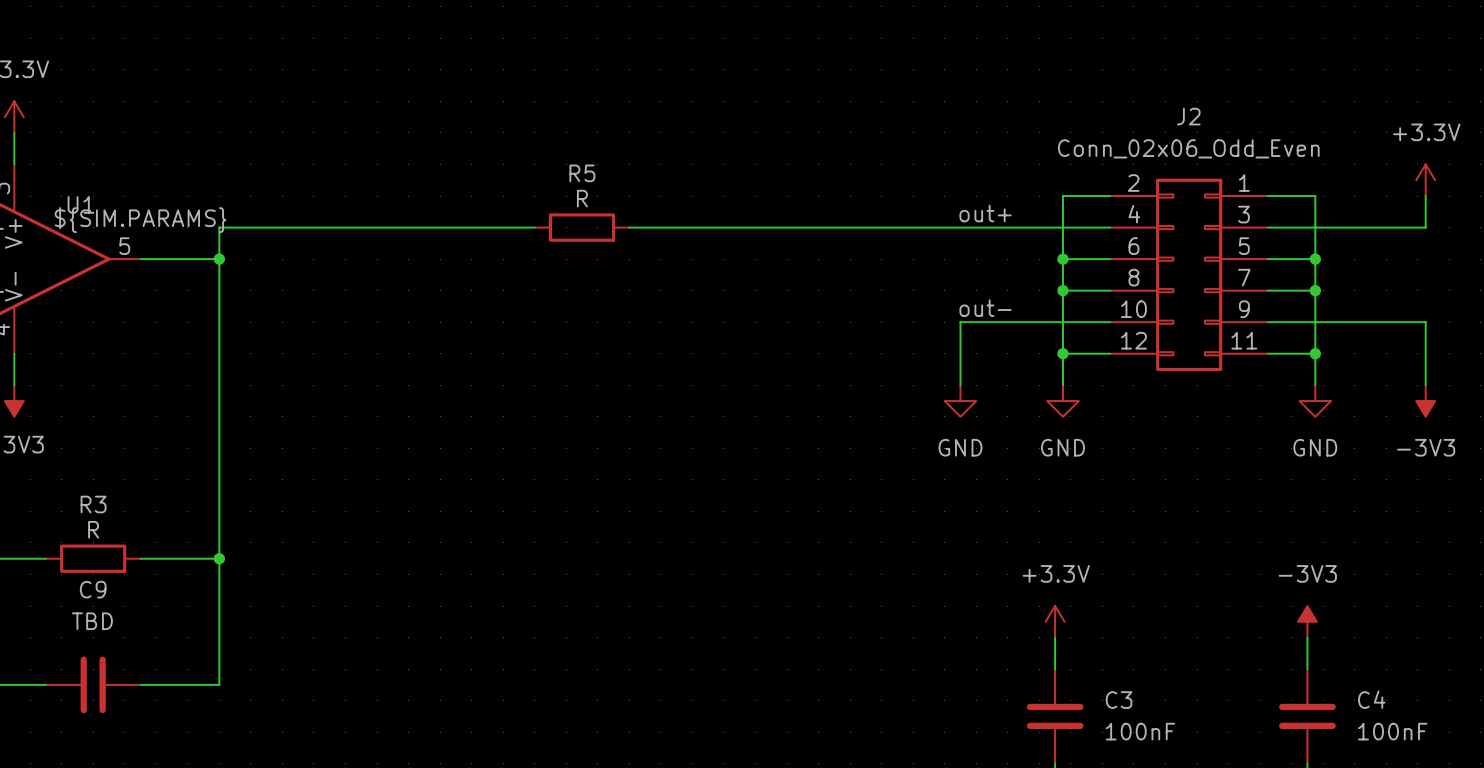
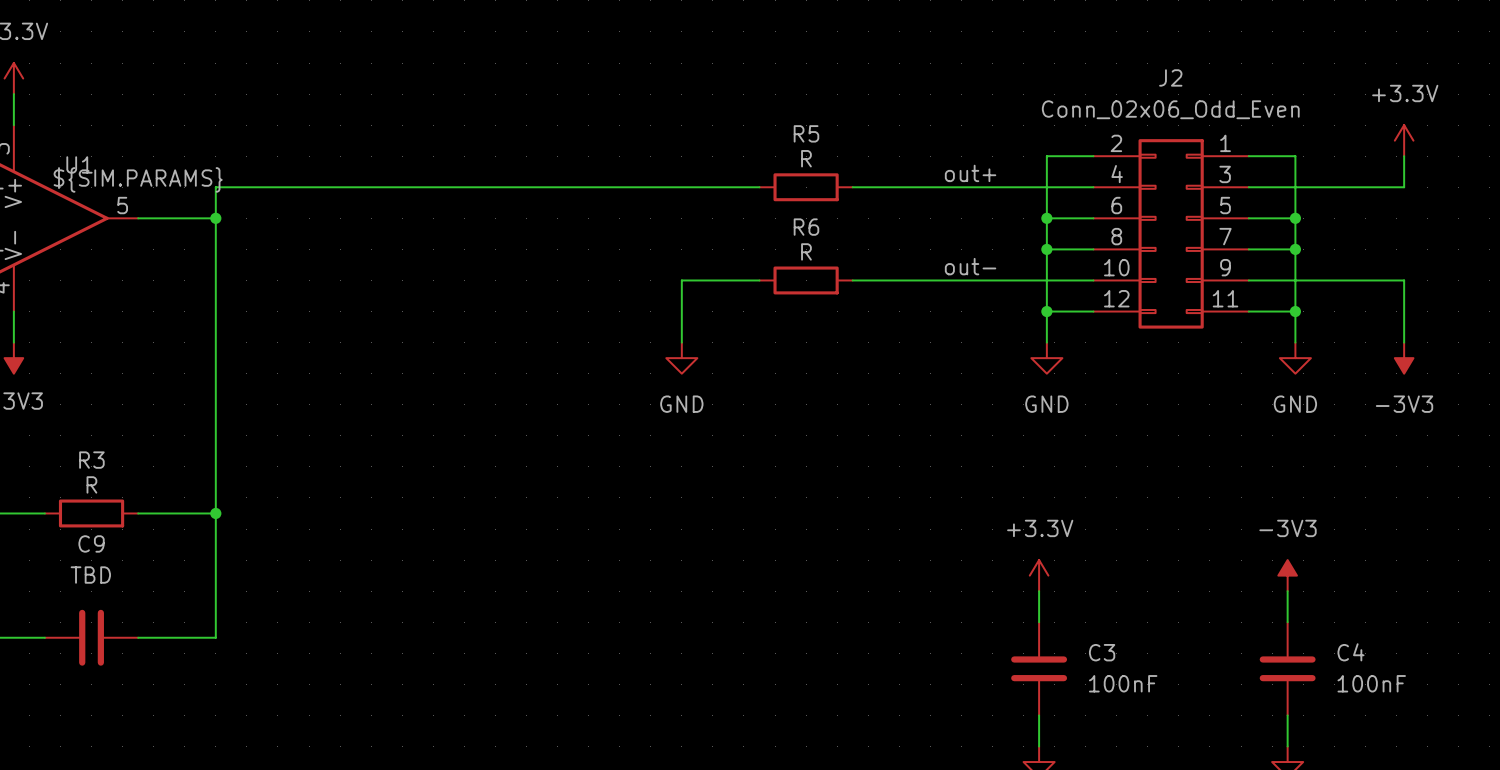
R5 position: (582, 227) -> (806, 187)
wire: (771, 227) (865, 227) -> (526, 187) (619, 187)
wire: none -> (759, 280) (681, 280) (681, 342)
R6: none -> R (806, 280)
wire: (960, 322) (960, 385) -> (945, 280) (852, 280)
power symbol position: GND (960, 401) -> GND (681, 358)

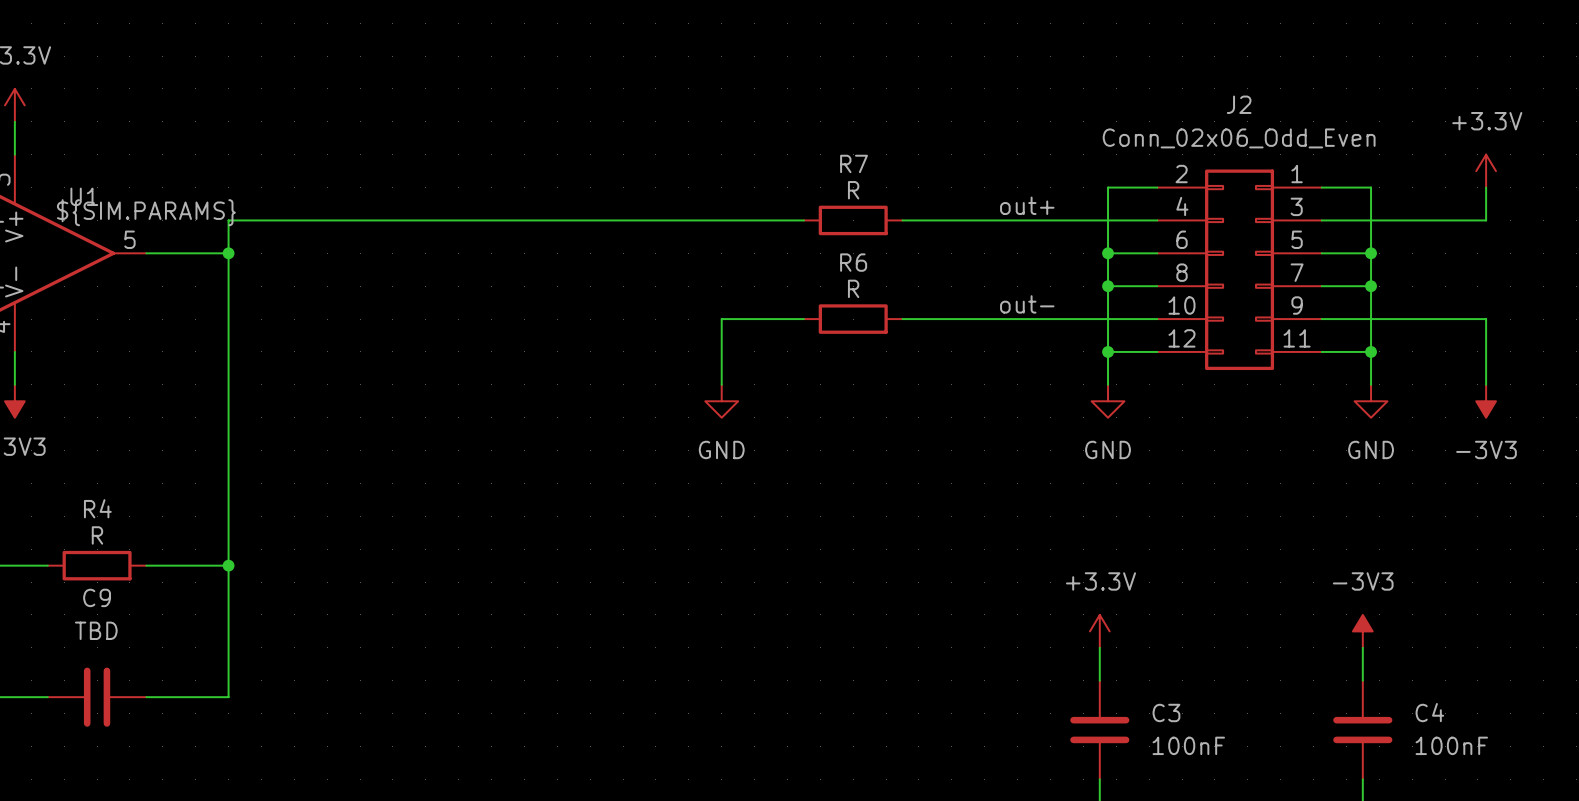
R5 name: R5 (806, 133) -> R7 (854, 163)
R3 name: R3 (91, 460) -> R4 (97, 508)

